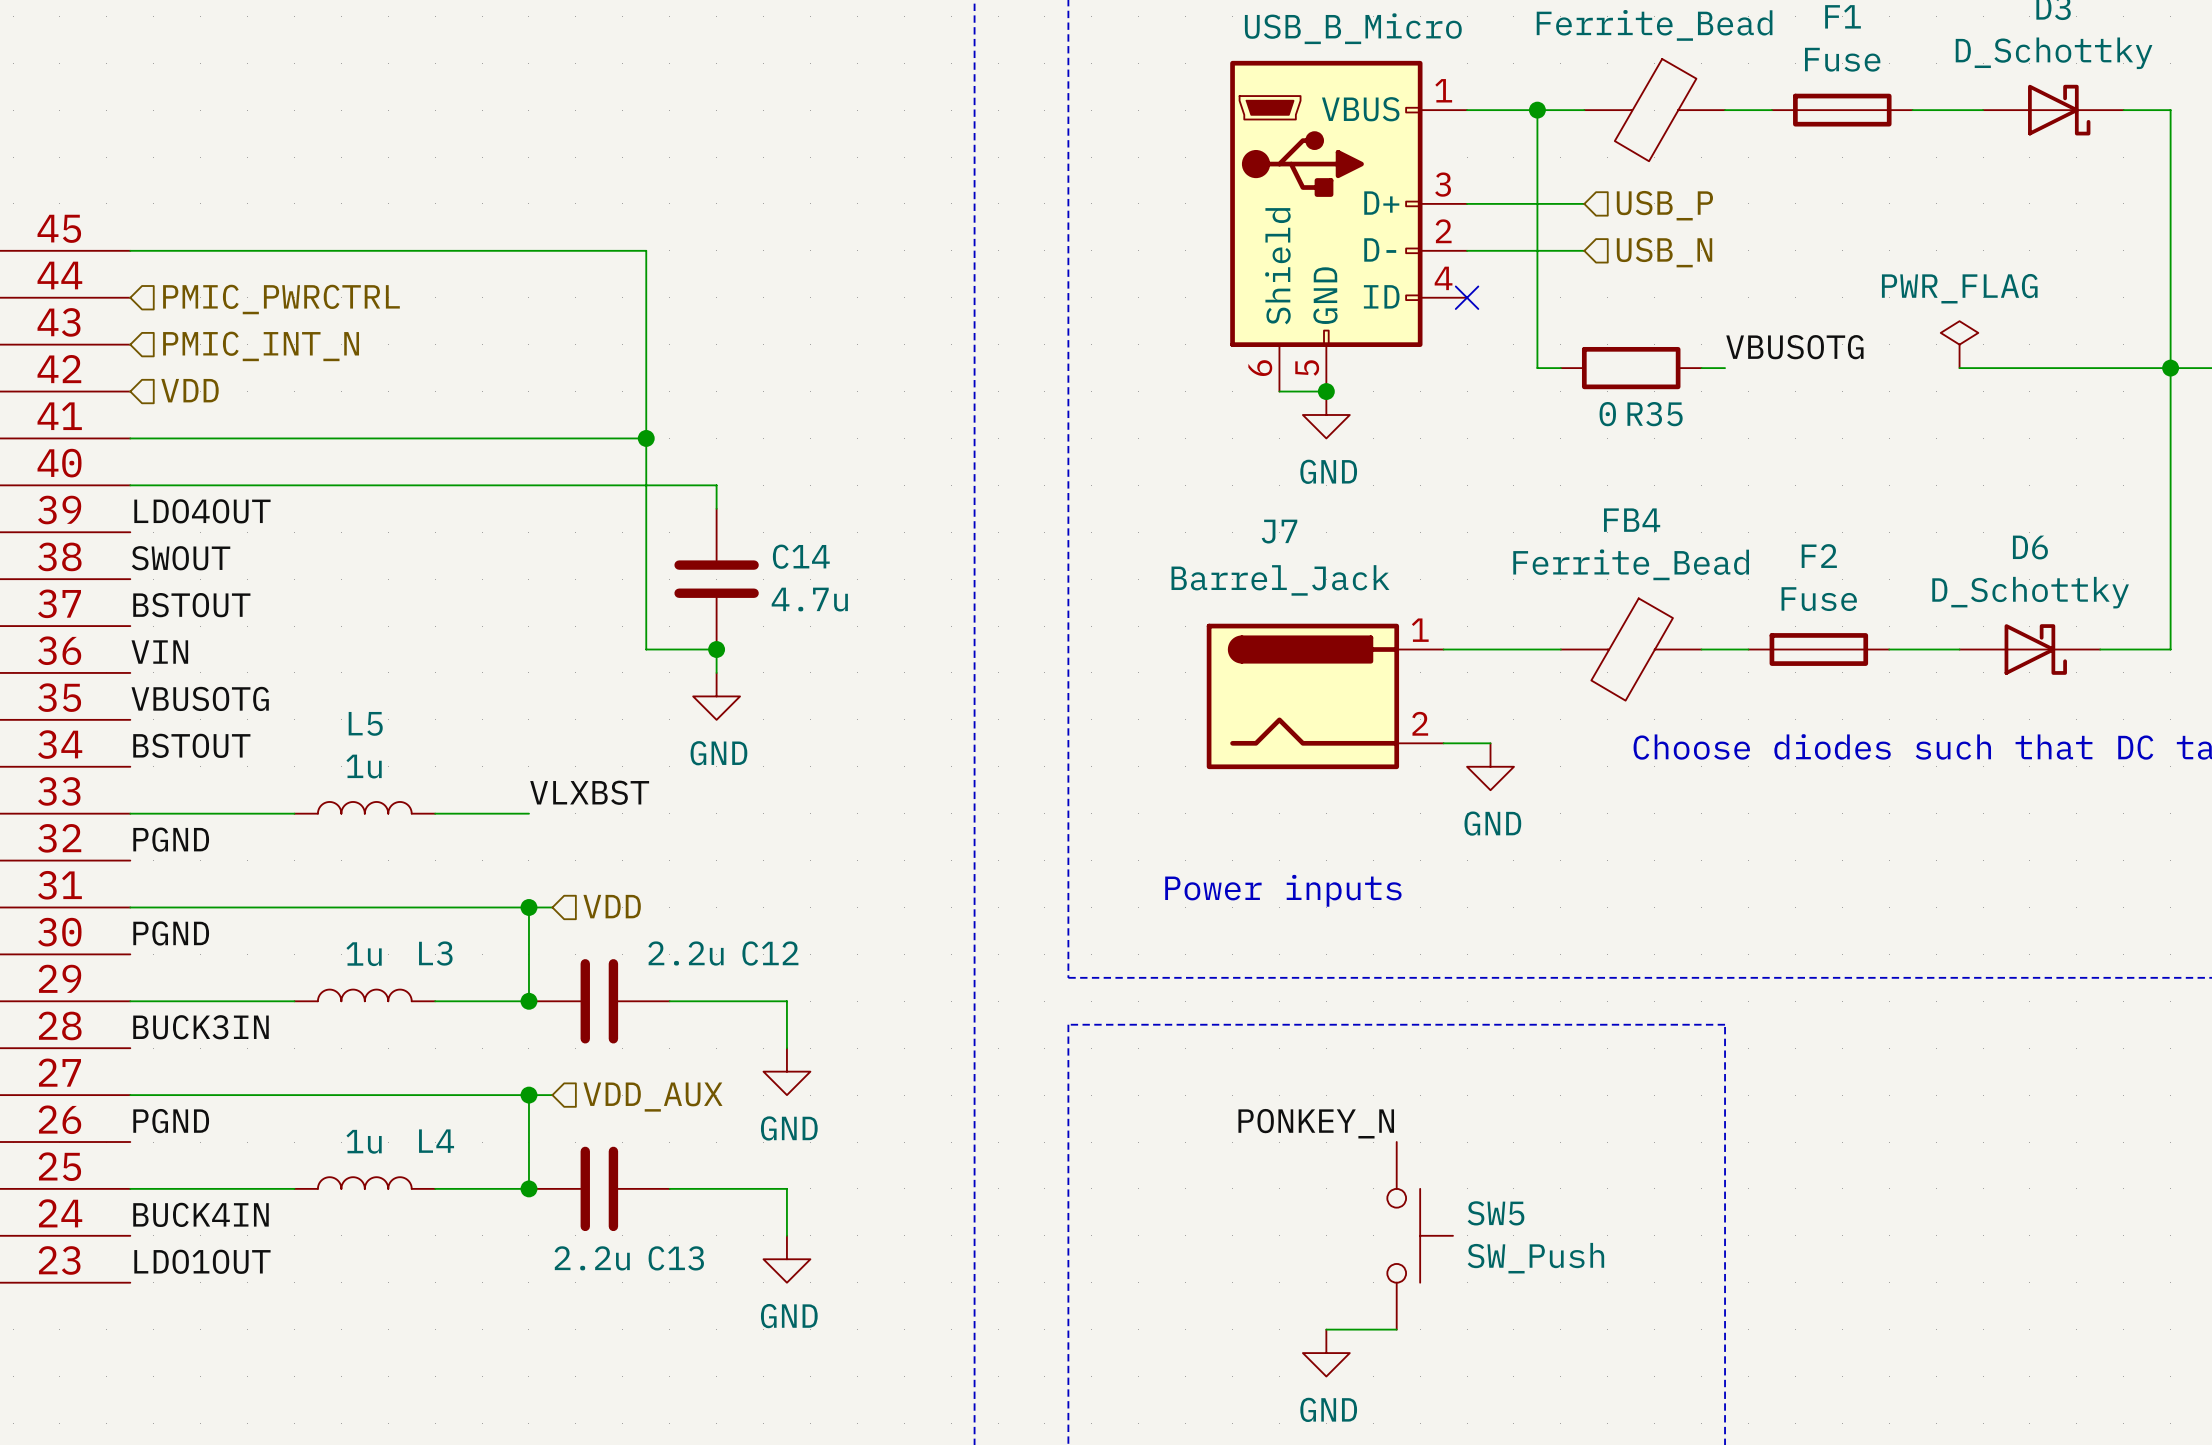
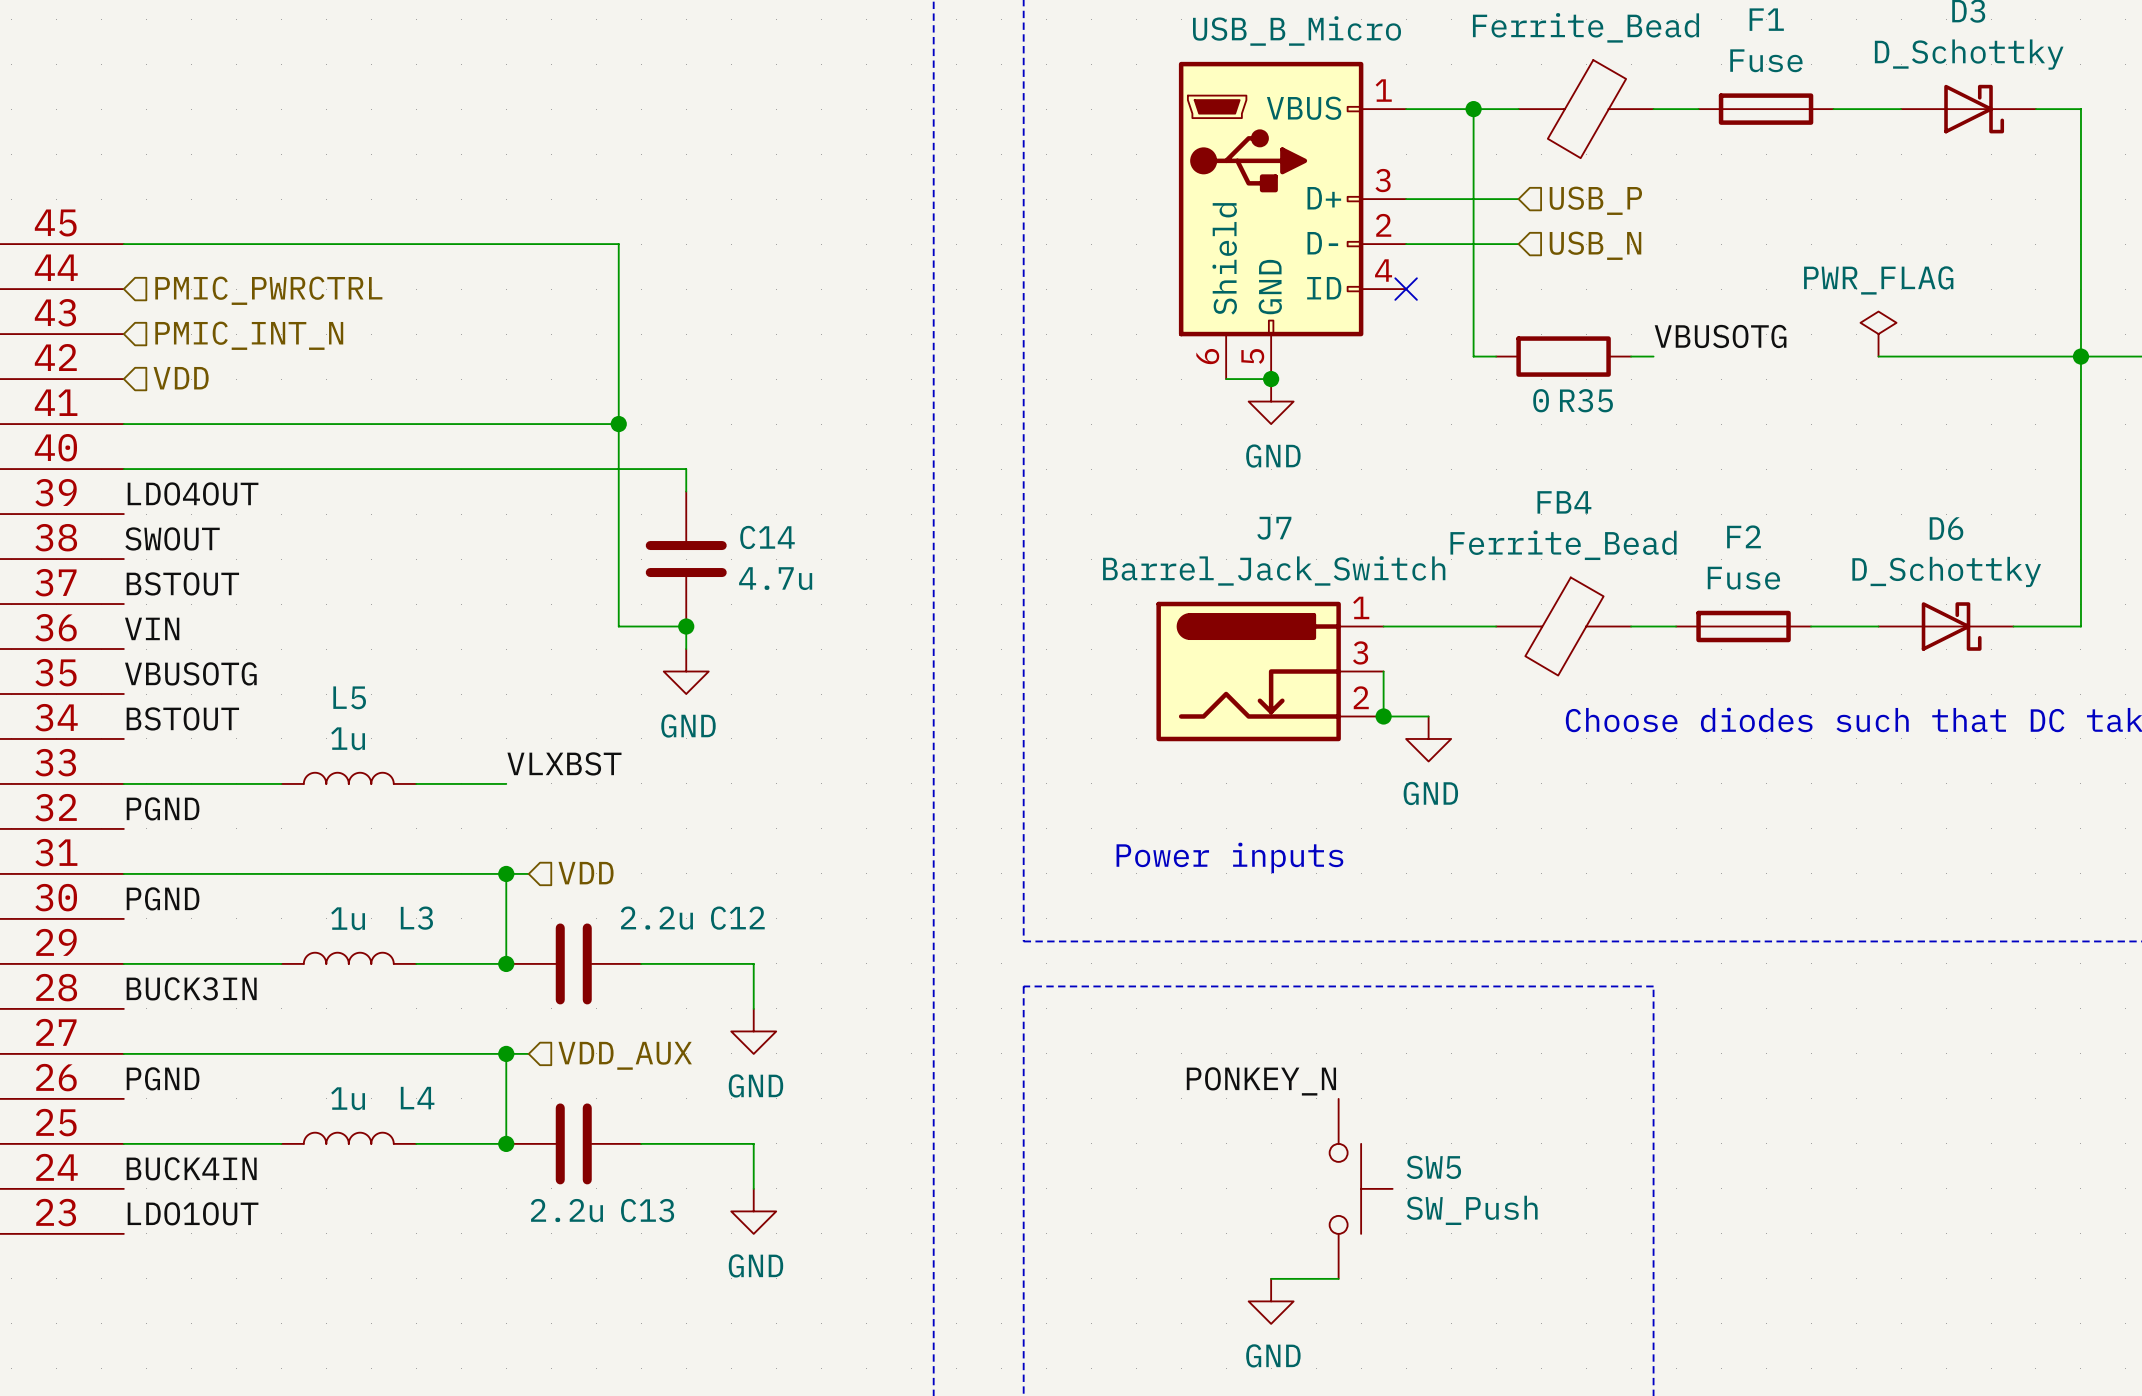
J7 name position: J7 (1279, 531) -> J7 (1274, 528)
J7 value: Barrel_Jack (1280, 580) -> Barrel_Jack_Switch (1274, 570)
J7 symbol: [1206, 623, 1444, 770] -> [1156, 601, 1384, 742]
wire: none -> (1383, 671) (1383, 716)
junction: none -> (1383, 716)

